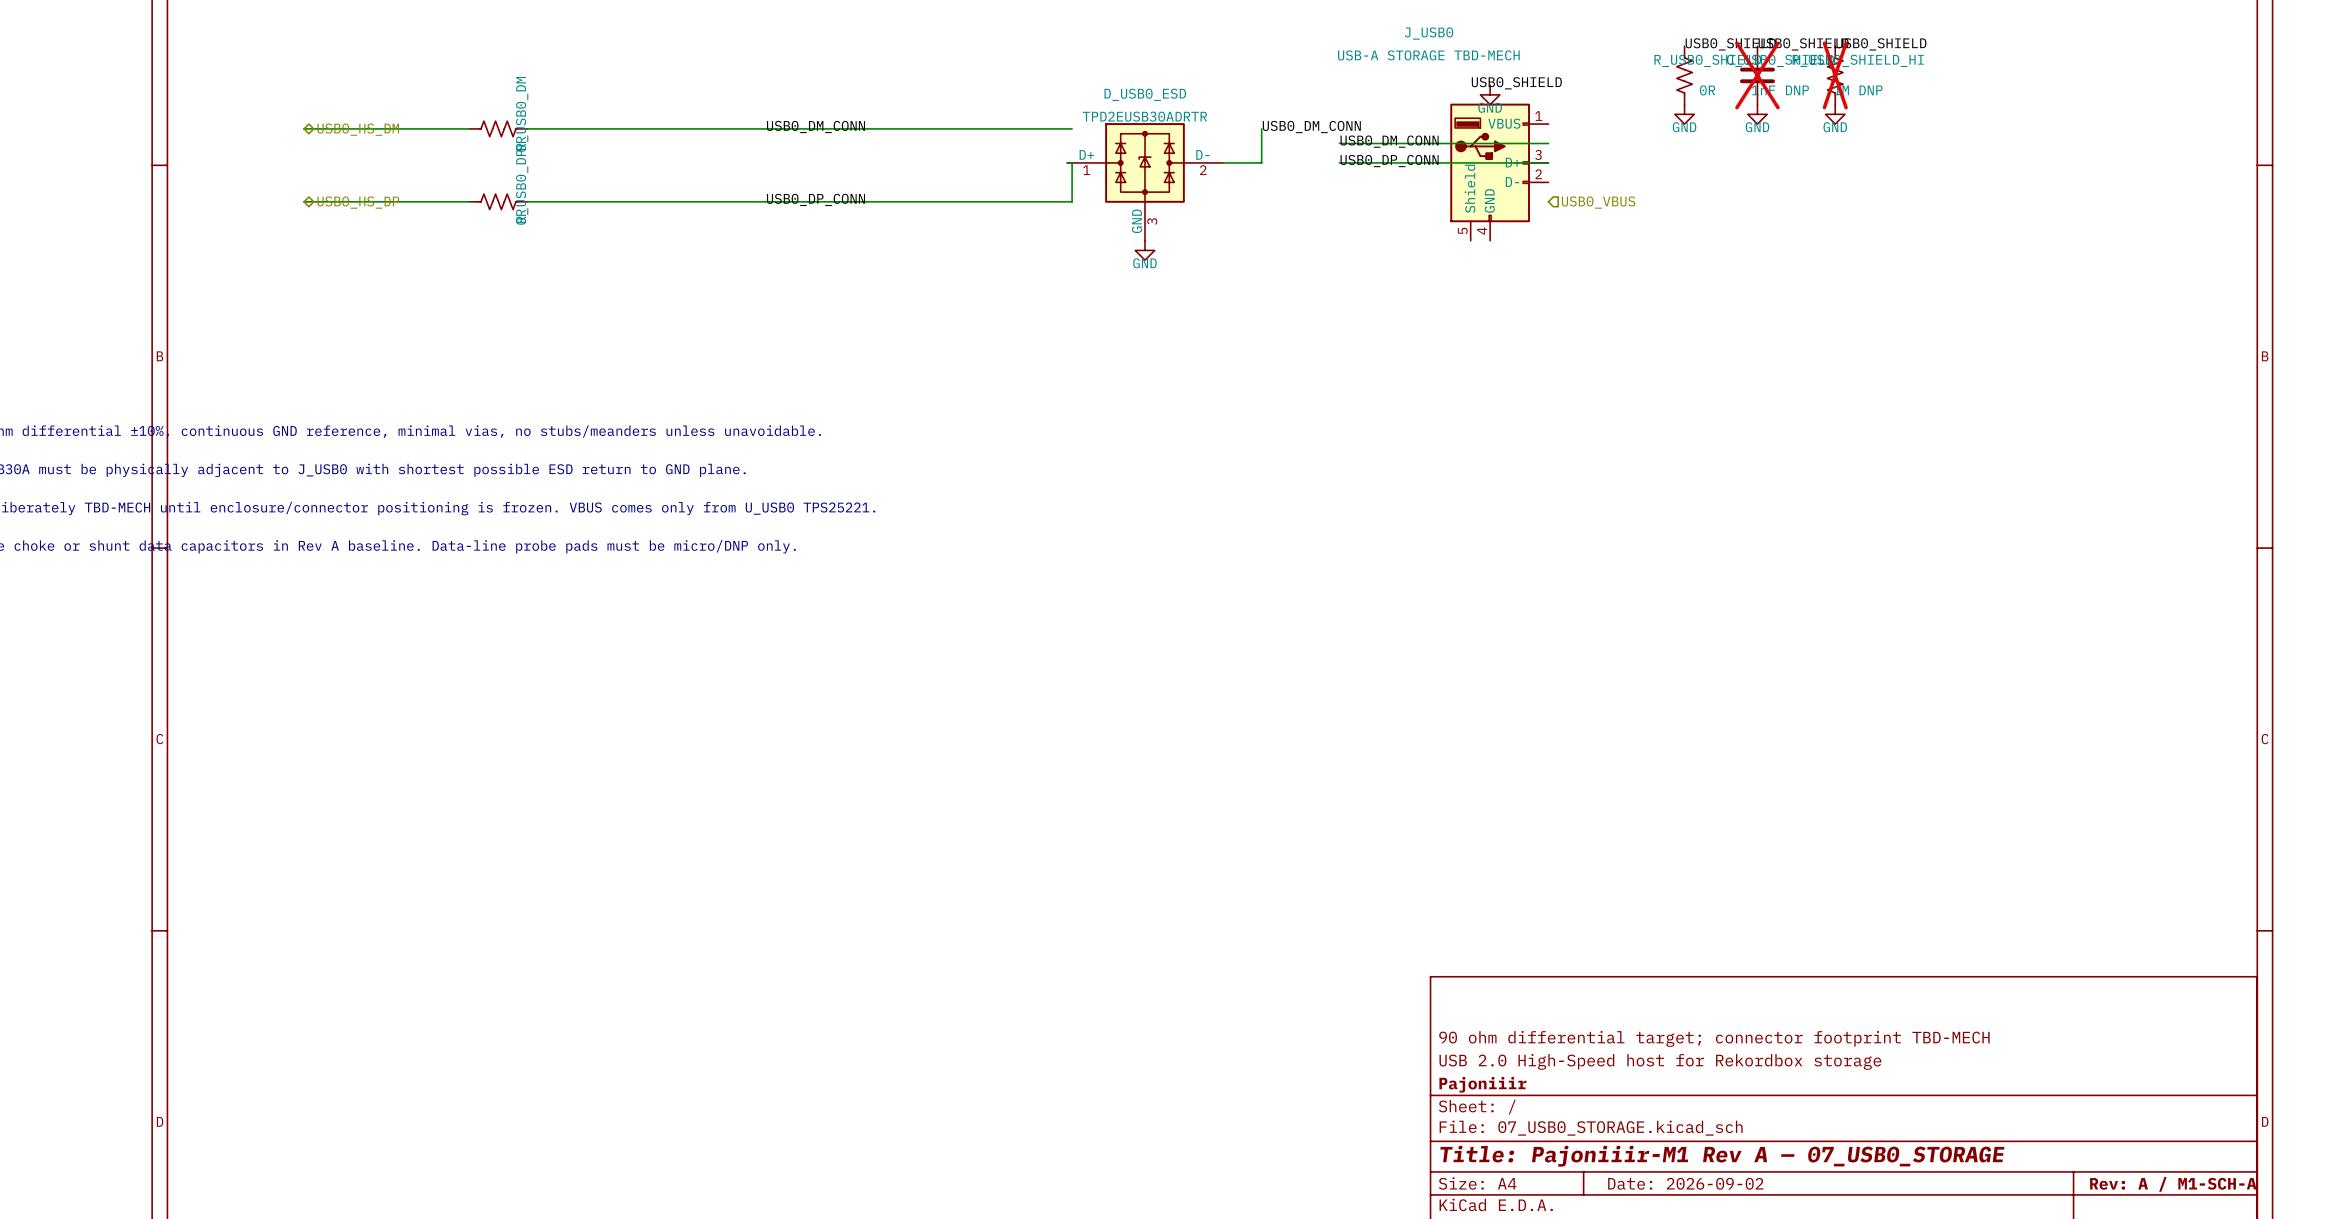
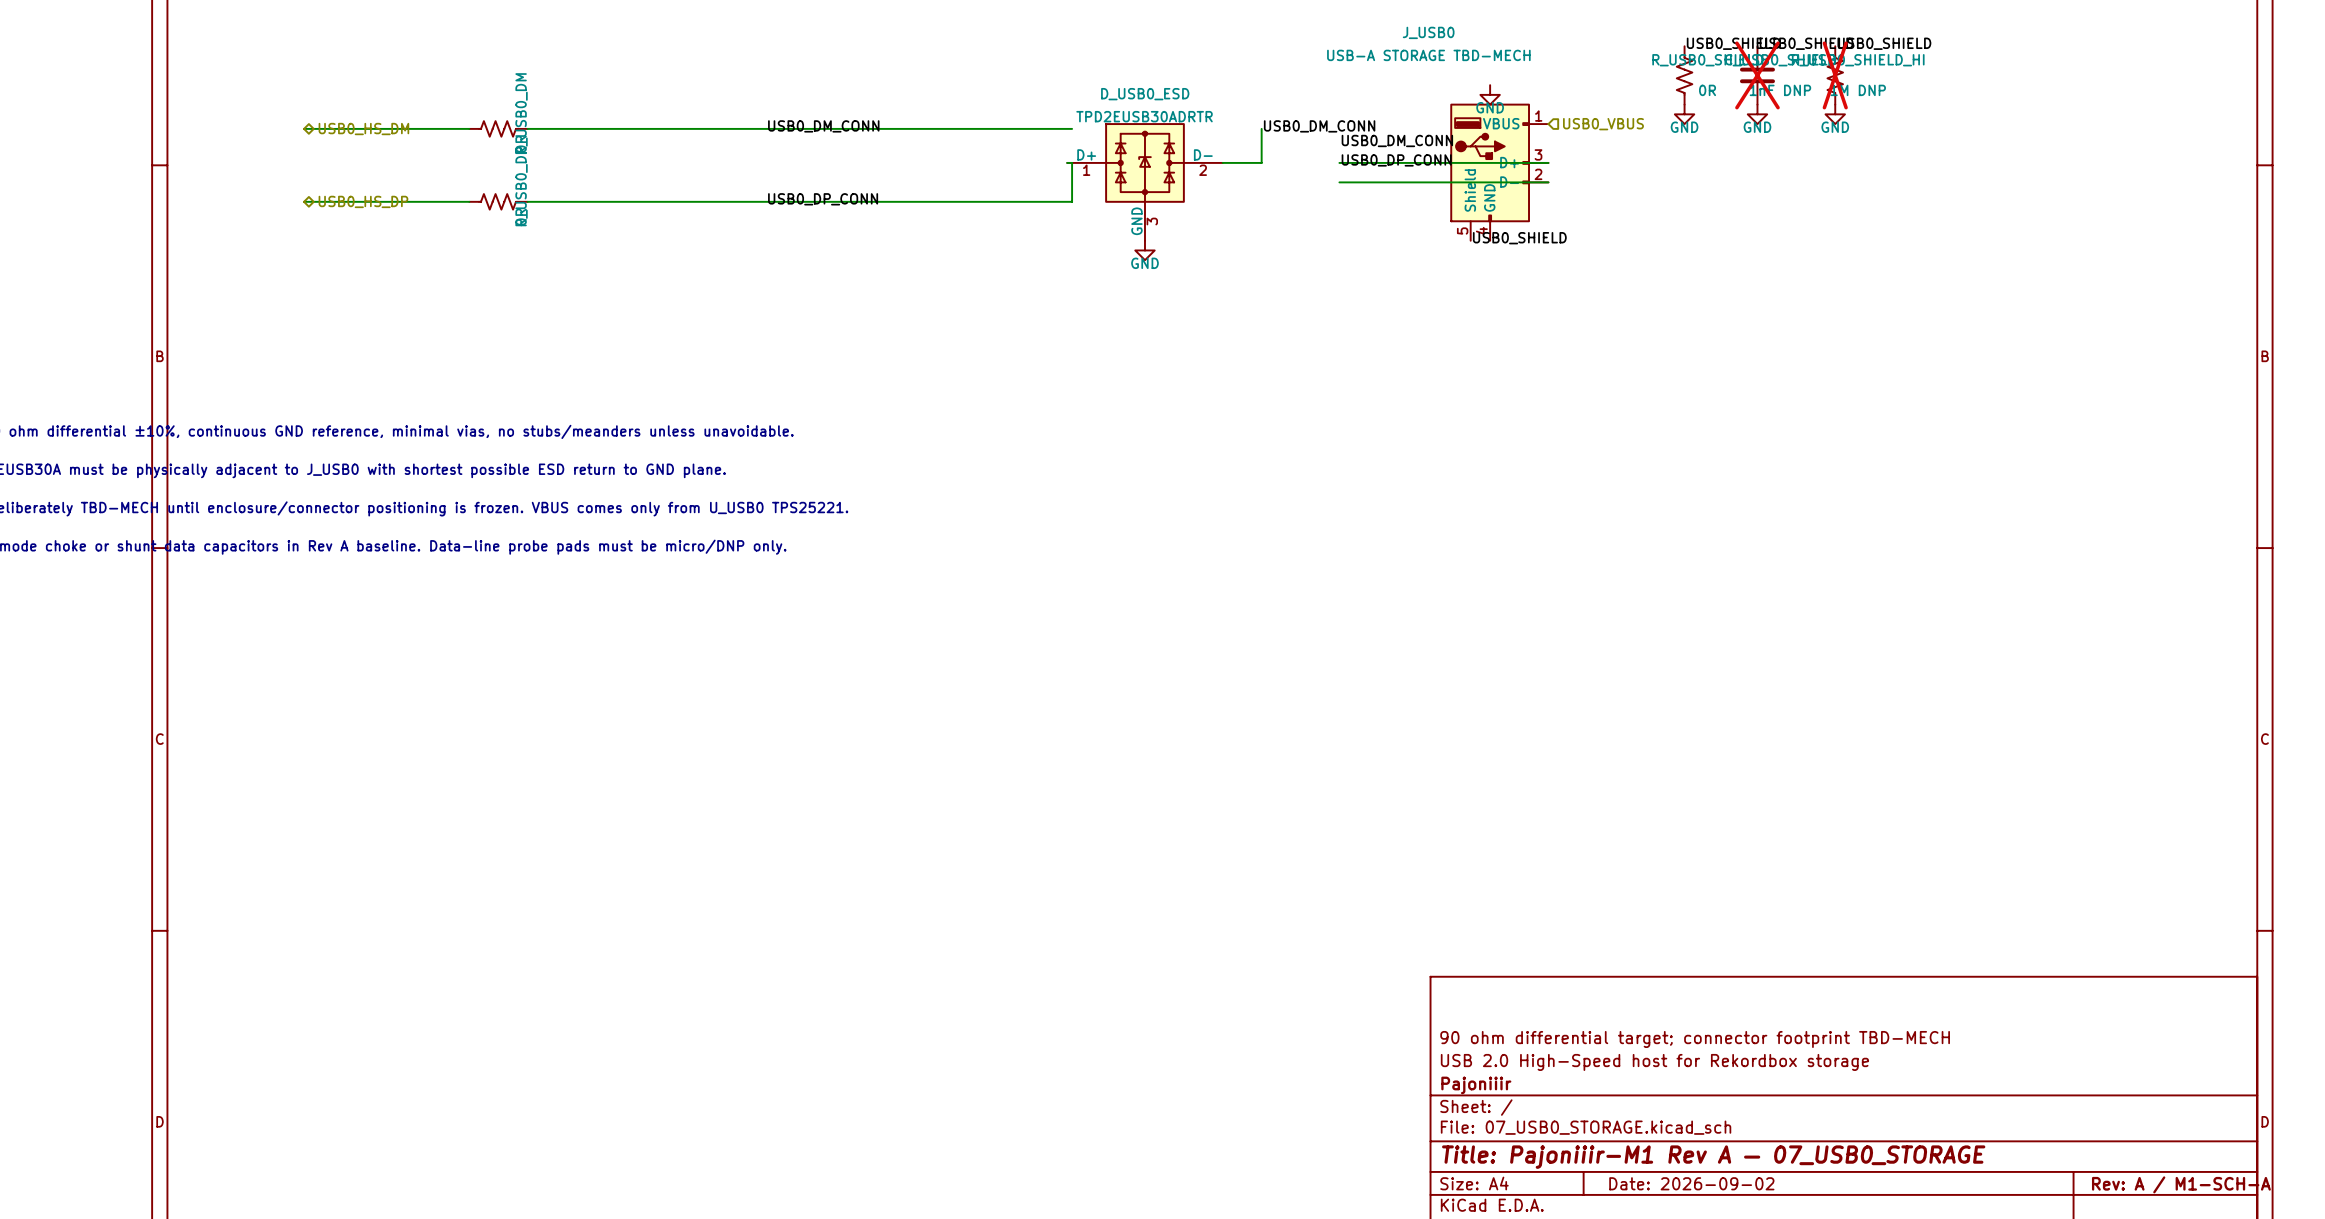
label position: USB0_SHIELD (1516, 83) -> USB0_SHIELD (1519, 238)
wire: (1339, 143) (1548, 143) -> (1339, 182) (1548, 182)
hierarchical label position: USB0_VBUS (1598, 202) -> USB0_VBUS (1603, 124)

